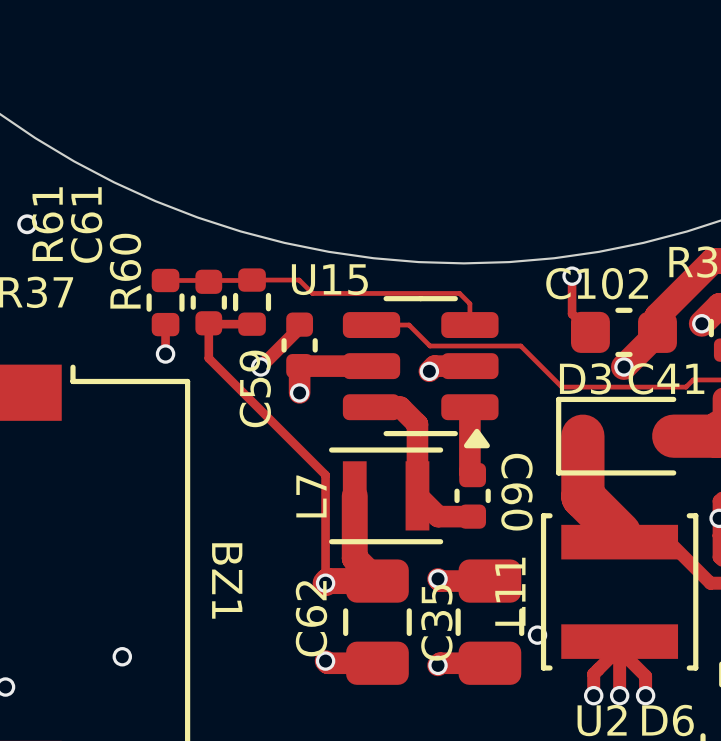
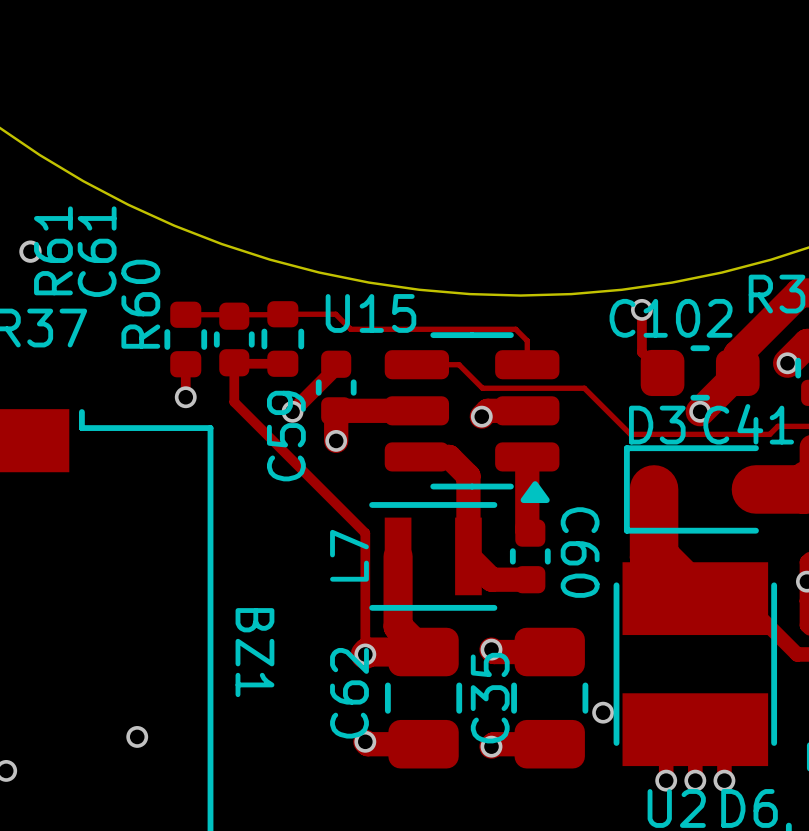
L11: (619, 591) -> none
part: none -> (695, 664)

